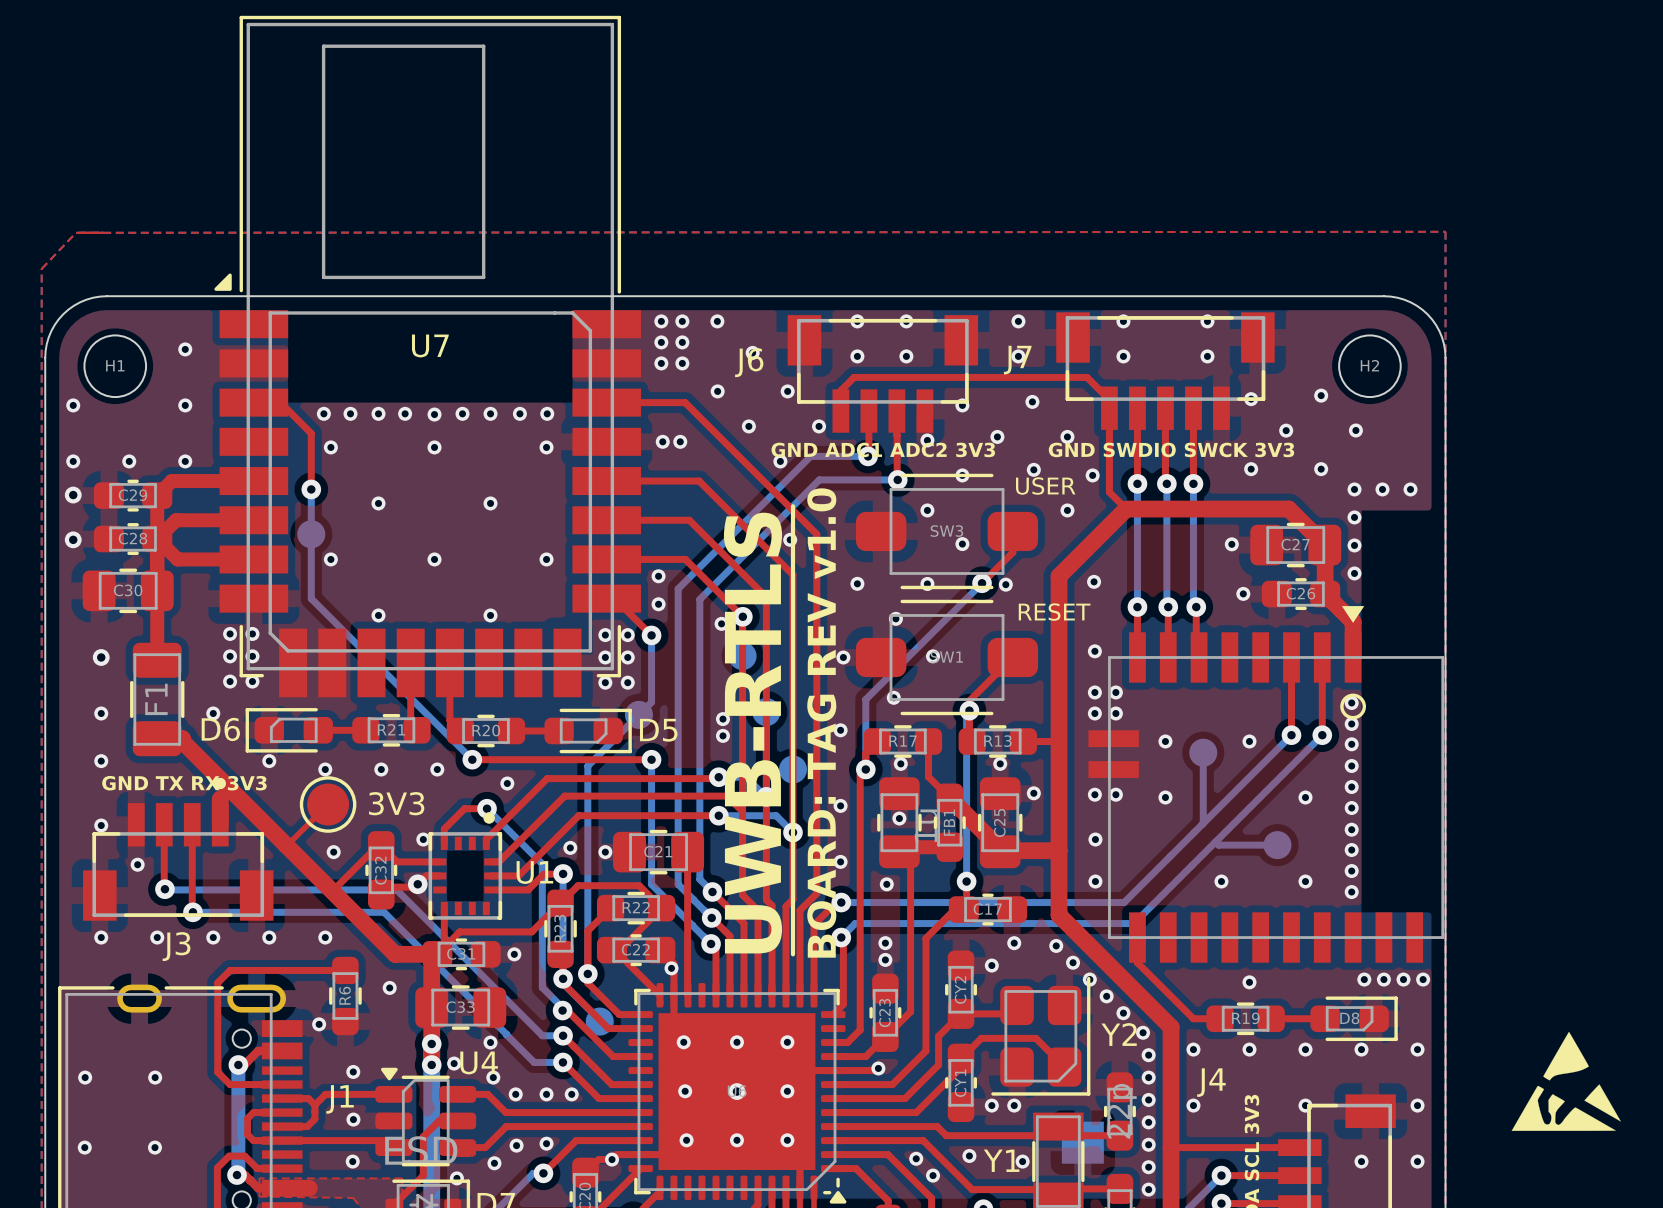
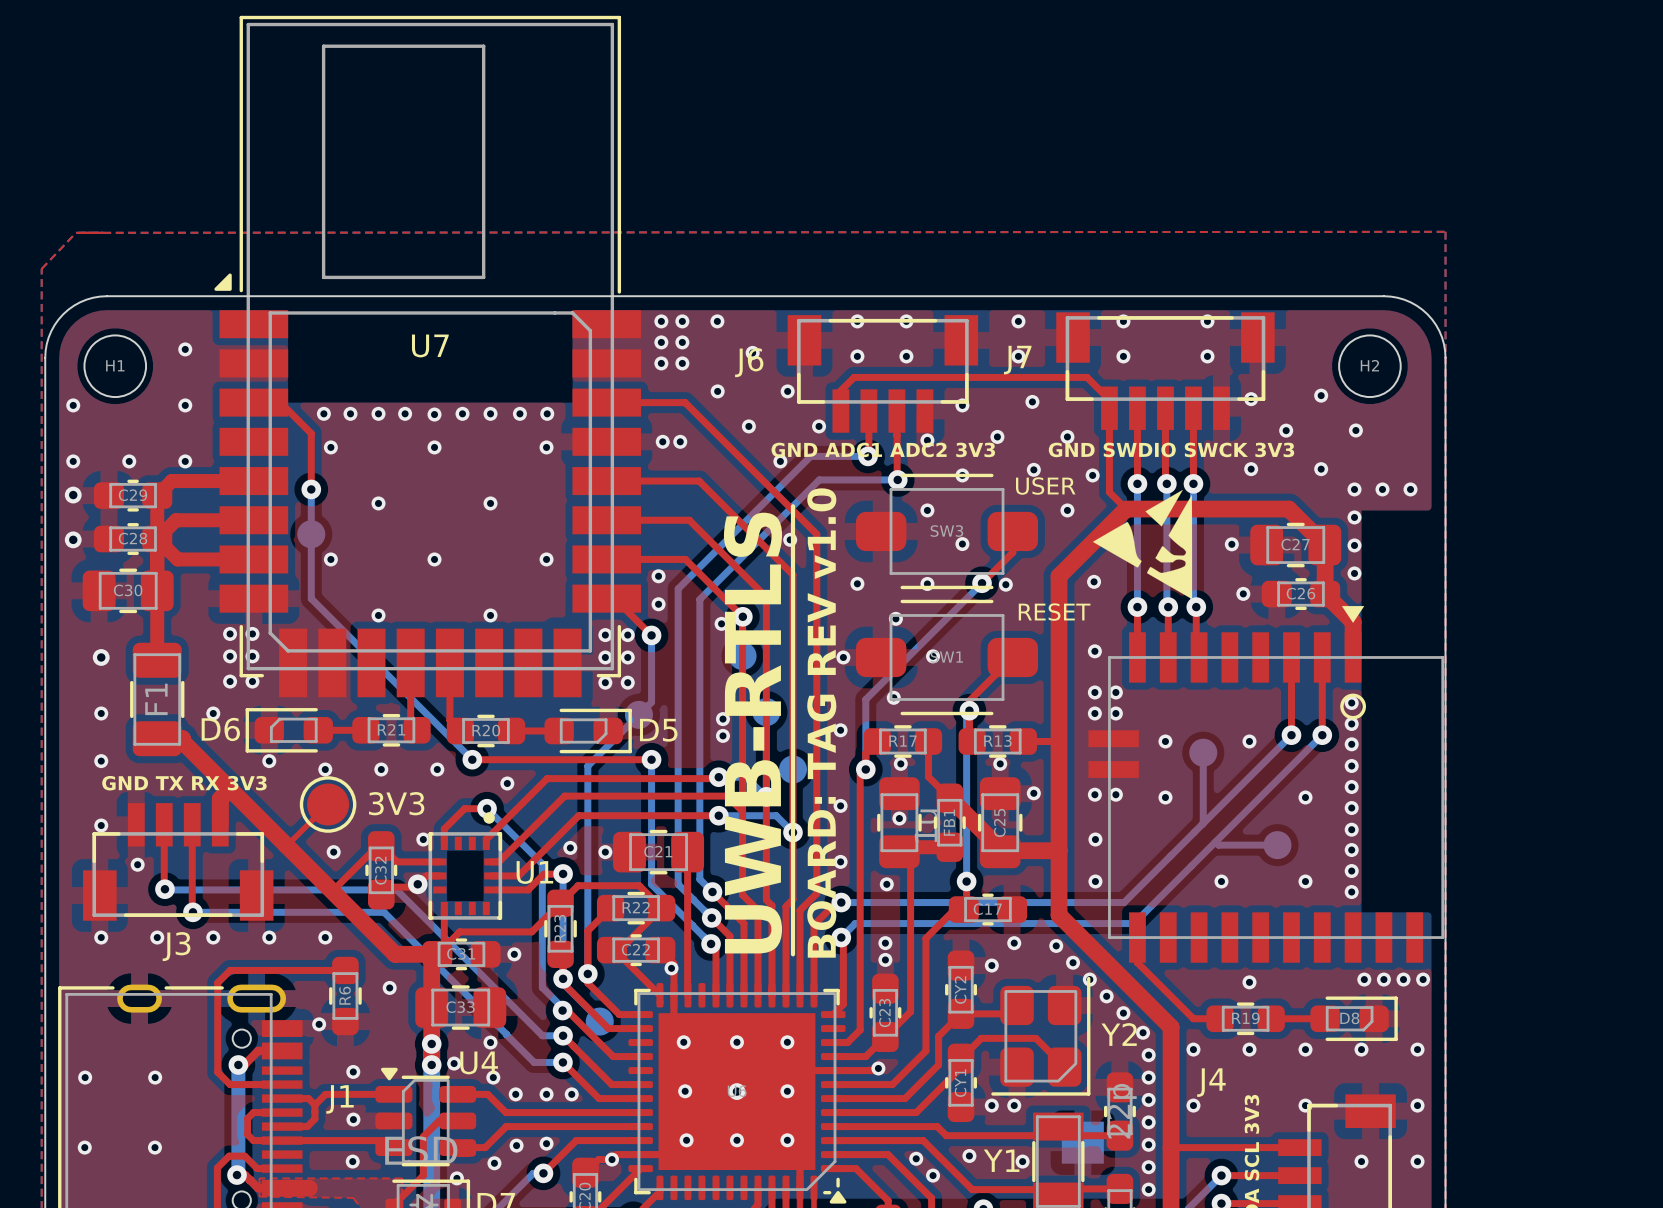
drawing: none -> [1093, 490, 1193, 600]
J3 footprint: [83, 777, 274, 921] -> [83, 803, 274, 921]
drawing: [1511, 1031, 1621, 1131] -> none

